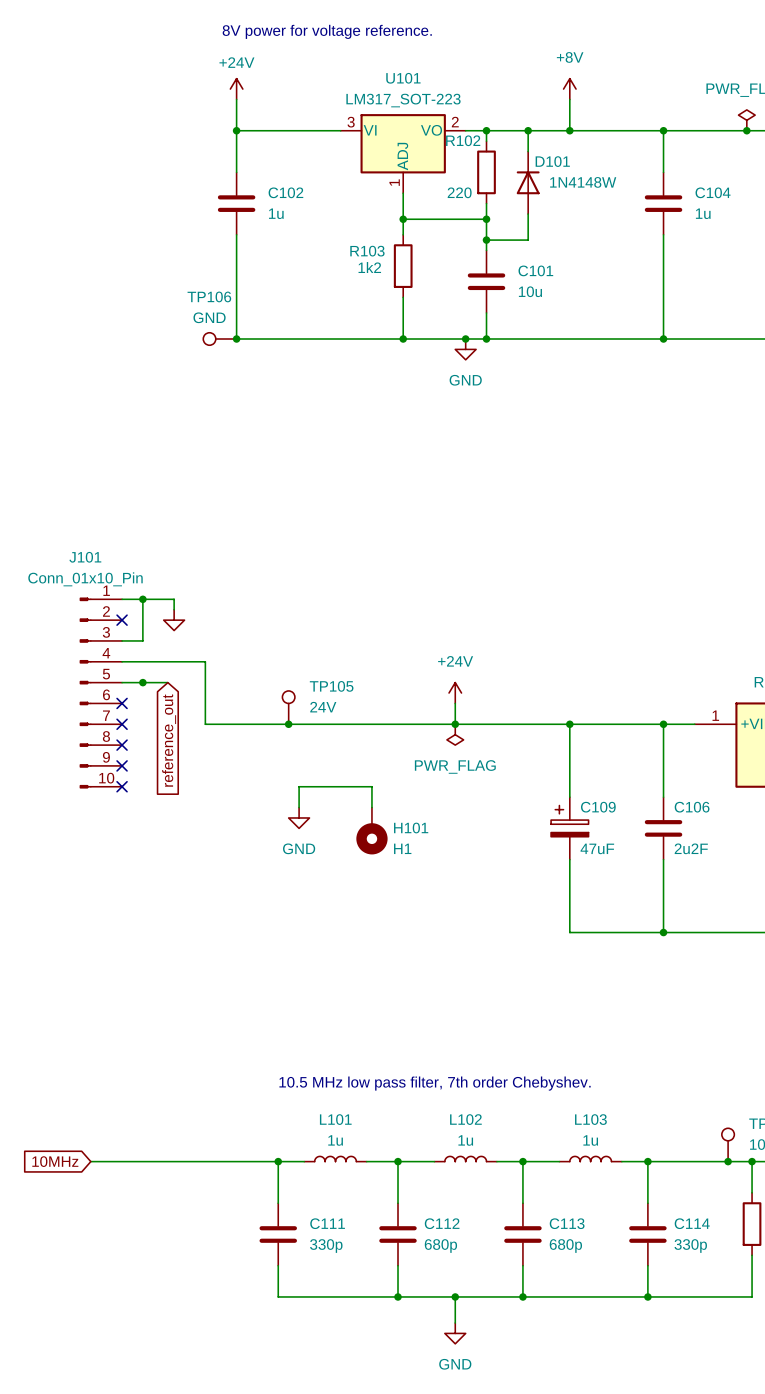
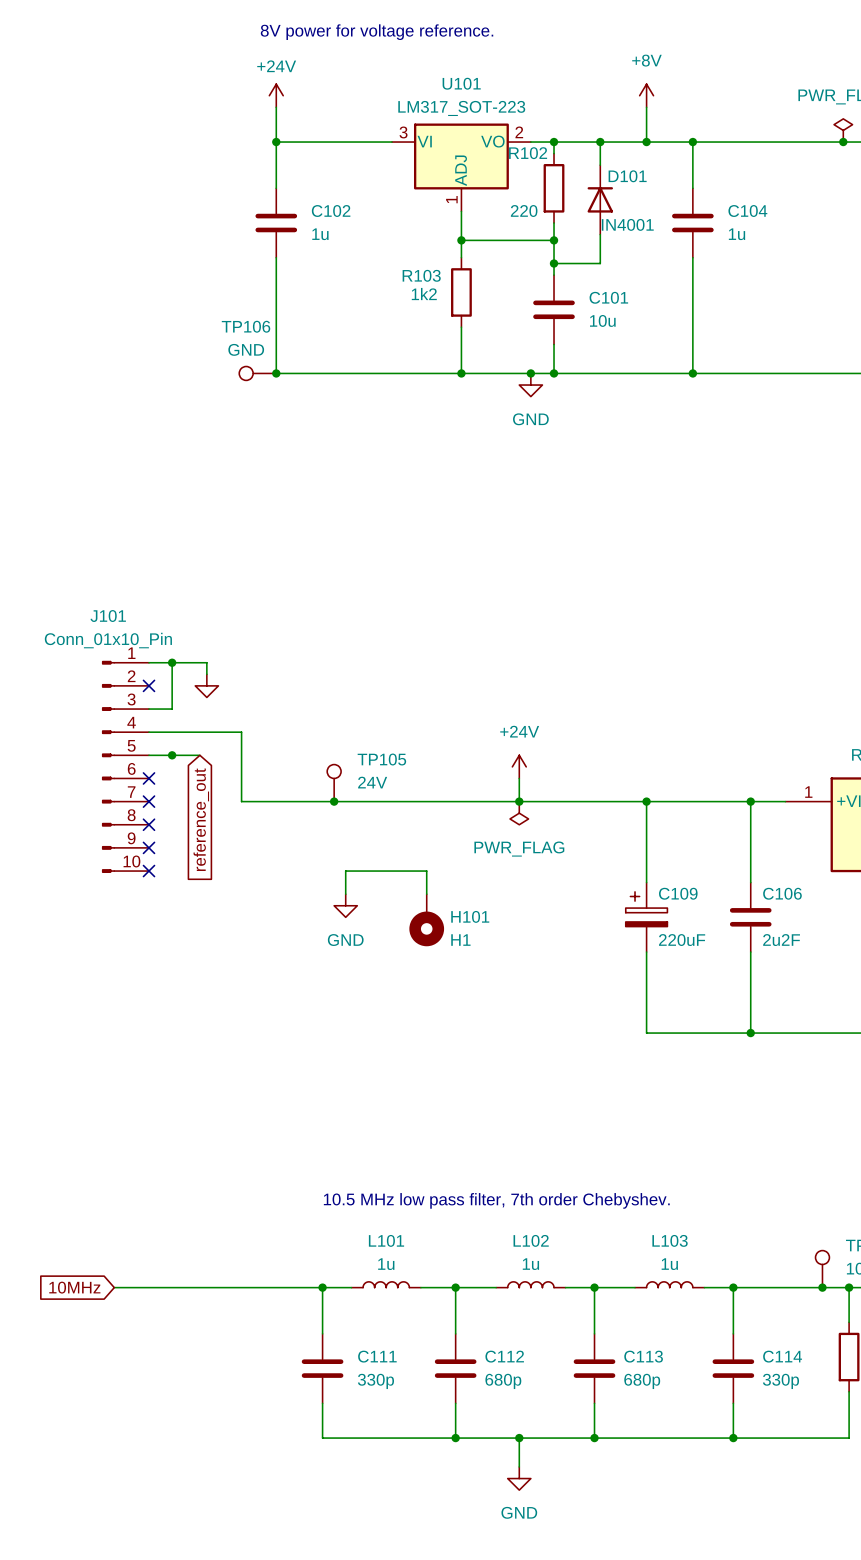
junction: none -> (692, 142)
wire: (663, 130) (663, 172) -> (692, 142) (692, 188)
junction: (663, 130) -> none
D101 value: 1N4148W (583, 182) -> IN4001 (627, 224)
C104 position: (663, 203) -> (692, 223)
wire: (663, 234) (663, 338) -> (692, 257) (692, 373)
junction: none -> (692, 373)
junction: (663, 338) -> none
C109 value: 47uF (597, 848) -> 220uF (682, 940)

